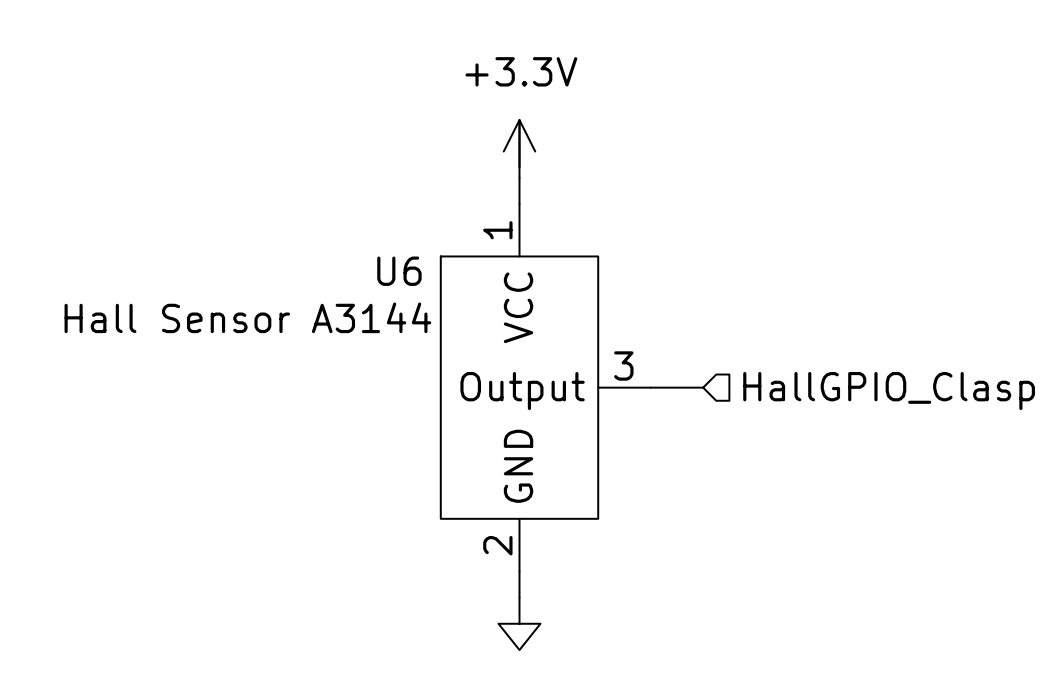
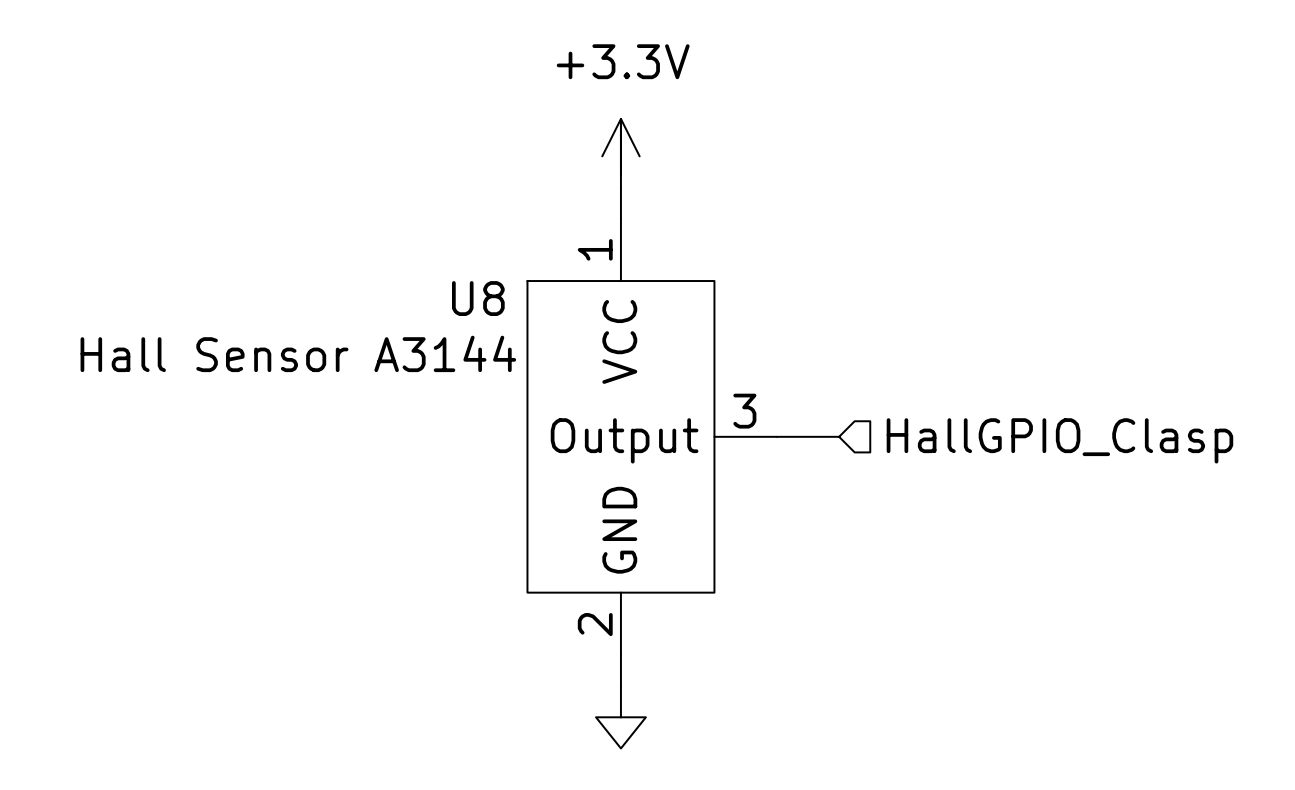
U6 name: U6 (399, 271) -> U8 (478, 298)

